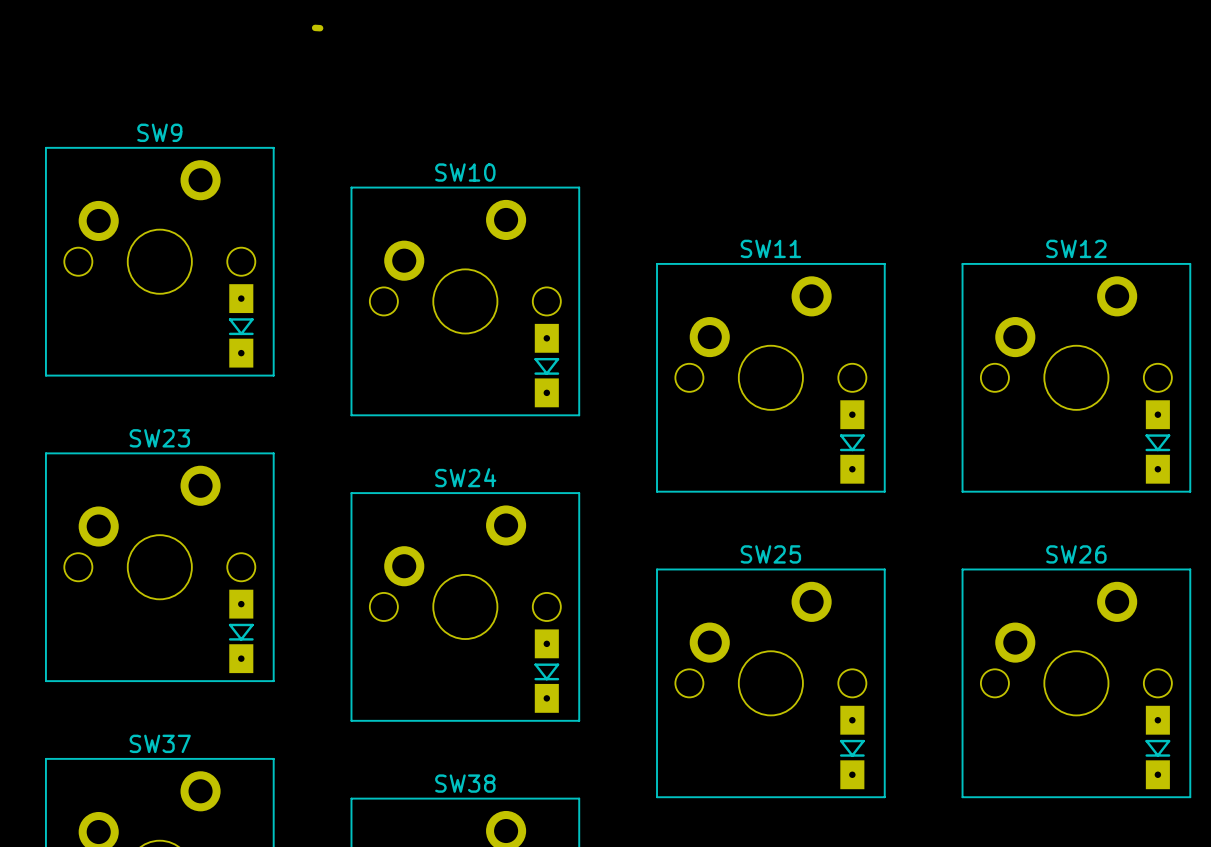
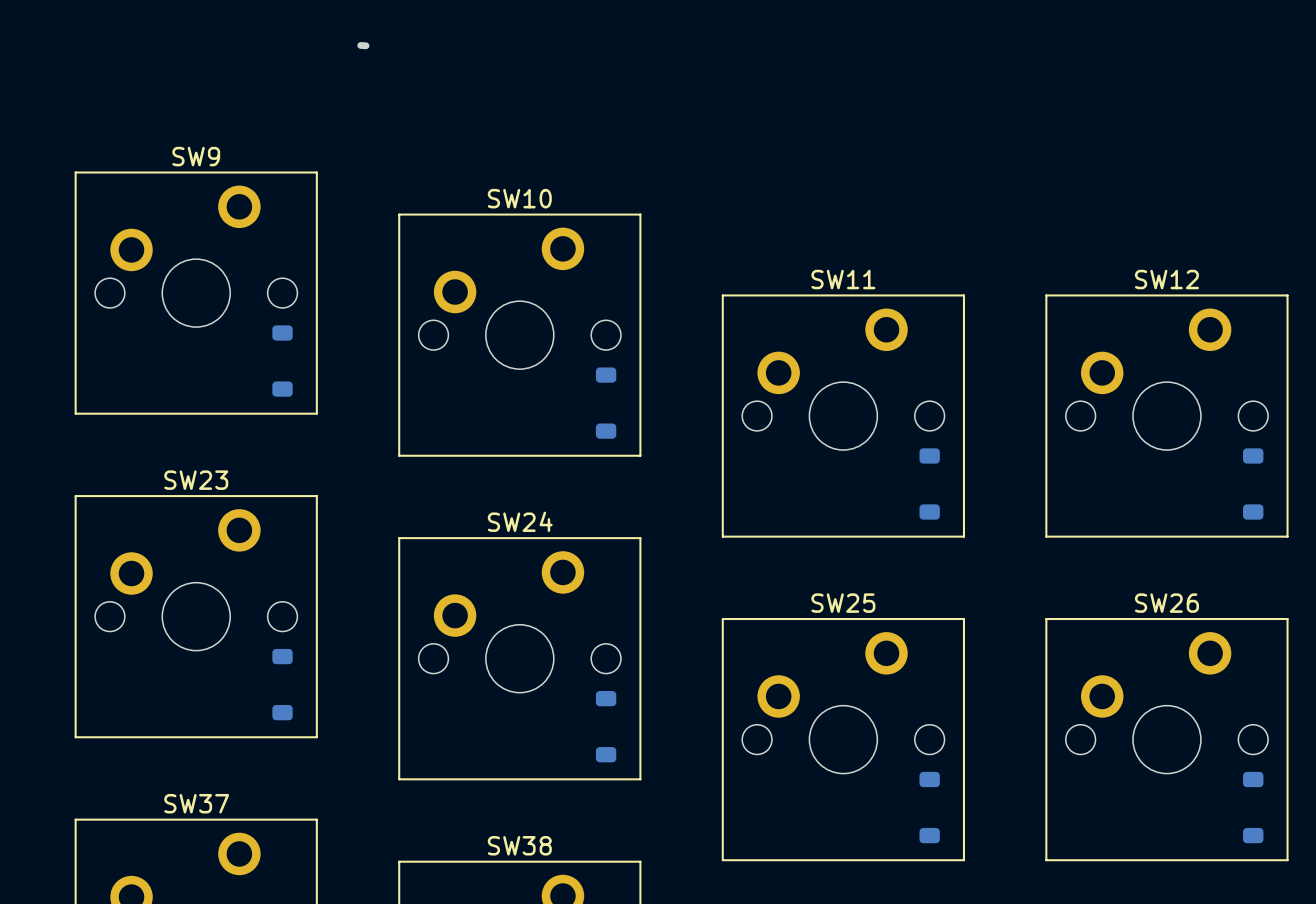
part footprint: [228, 284, 254, 368] -> [272, 325, 293, 397]
part footprint: [534, 323, 560, 408] -> [595, 367, 617, 439]
part footprint: [839, 400, 865, 484] -> [919, 448, 940, 520]
part footprint: [1145, 400, 1171, 484] -> [1243, 448, 1264, 520]
part footprint: [228, 589, 254, 674] -> [272, 648, 293, 721]
part footprint: [534, 629, 560, 713] -> [595, 690, 617, 763]
part footprint: [839, 705, 865, 790] -> [919, 771, 940, 844]
part footprint: [1145, 705, 1171, 790] -> [1243, 771, 1264, 844]

